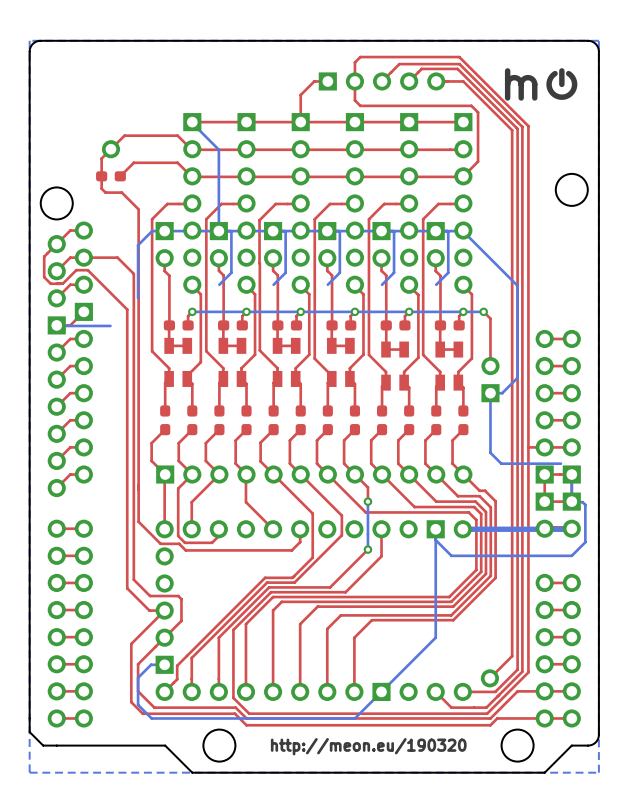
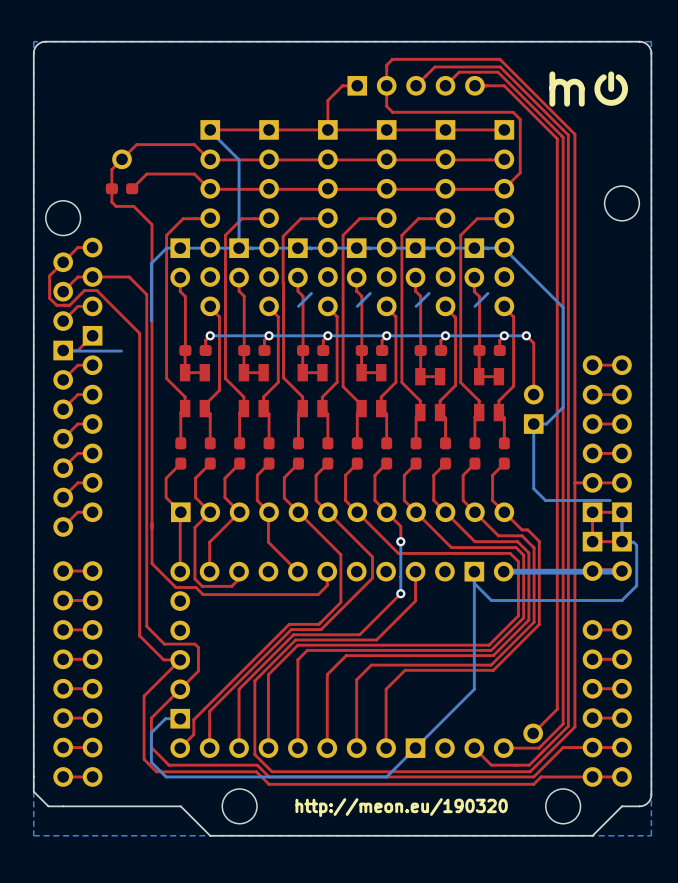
bottom track: (231, 231) (231, 272) (219, 284) -> none
bottom track: (285, 231) (285, 272) -> none
bottom track: (339, 231) (339, 272) -> none
bottom track: (394, 231) (394, 272) -> none
bottom track: (448, 231) (448, 272) -> none

